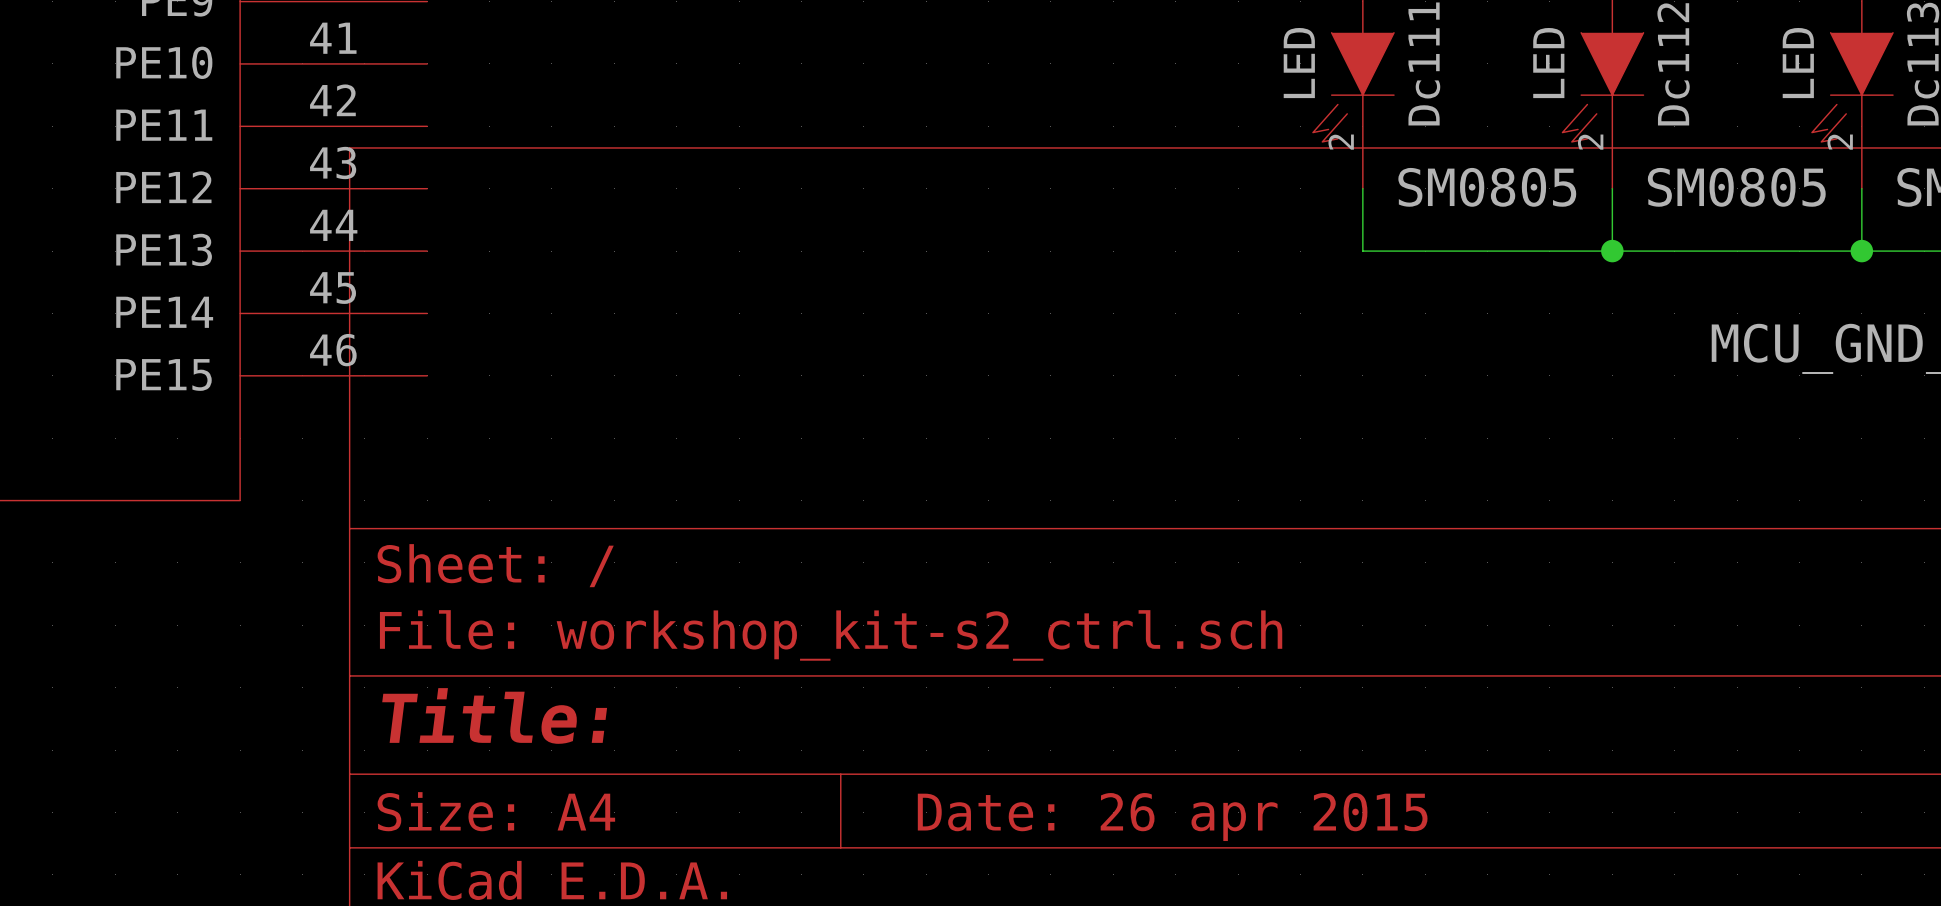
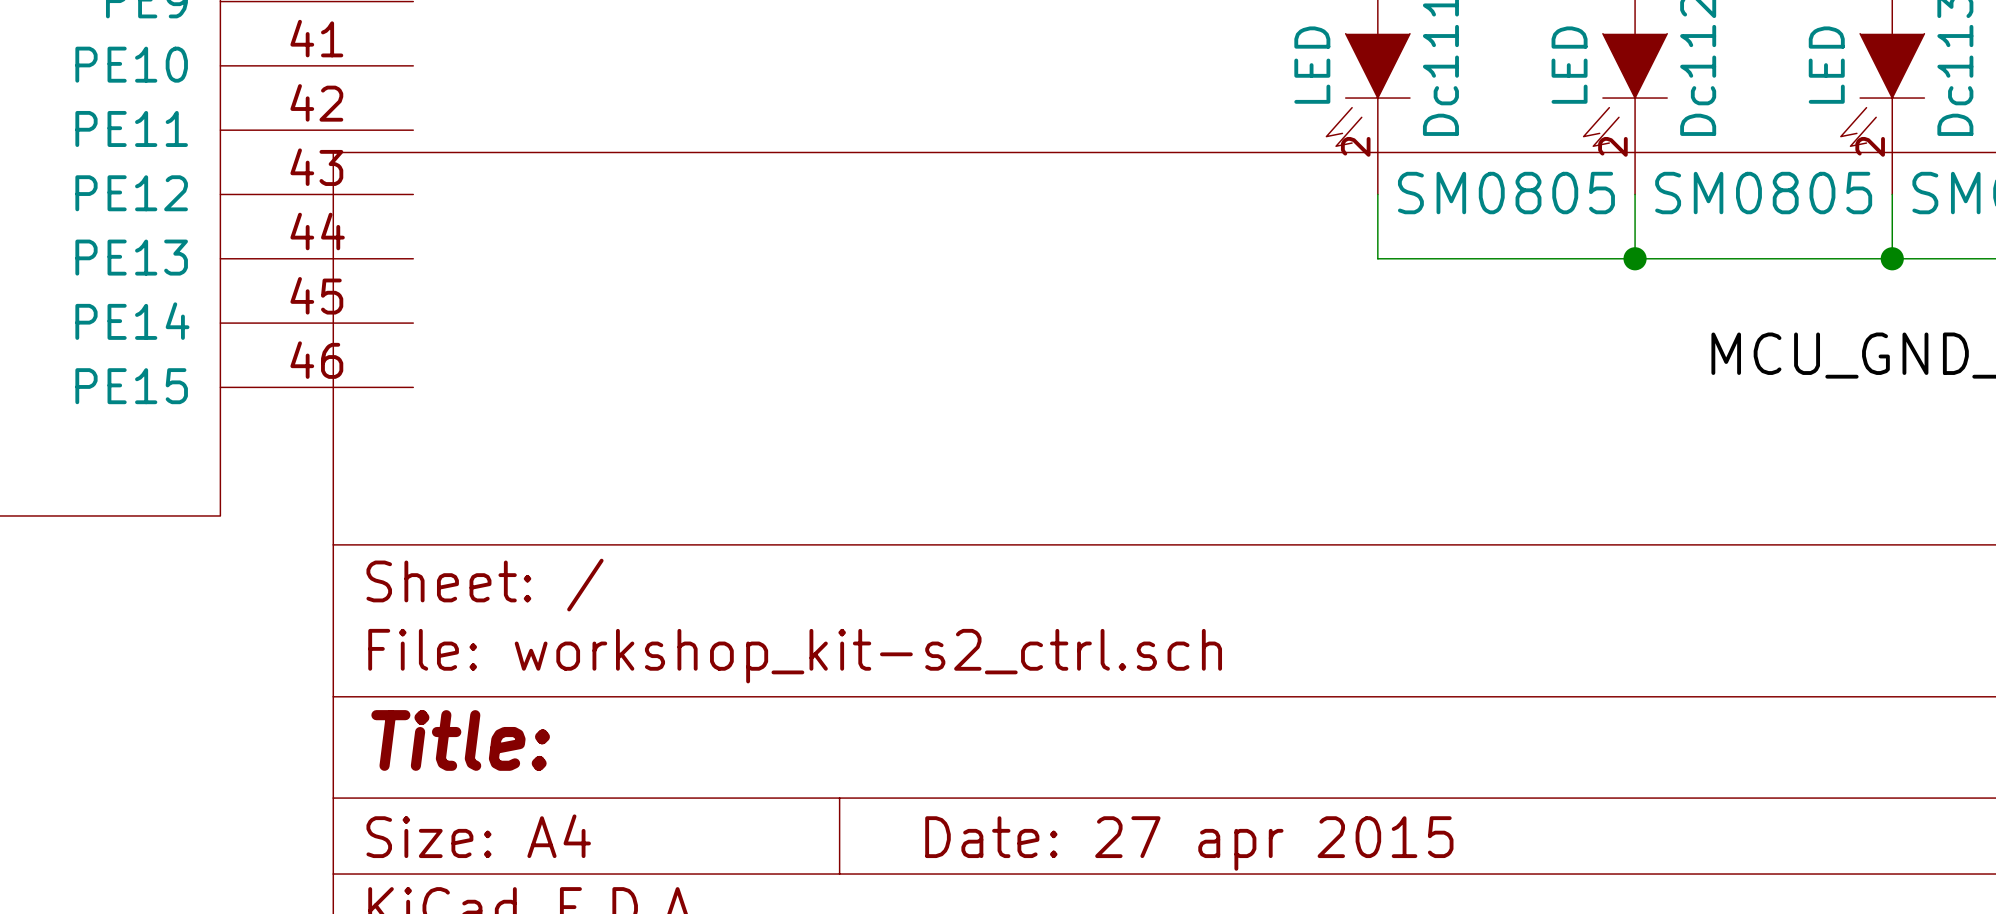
title block: Date: 26 apr 2015 (1172, 817) -> Date: 27 apr 2015 (1189, 843)

